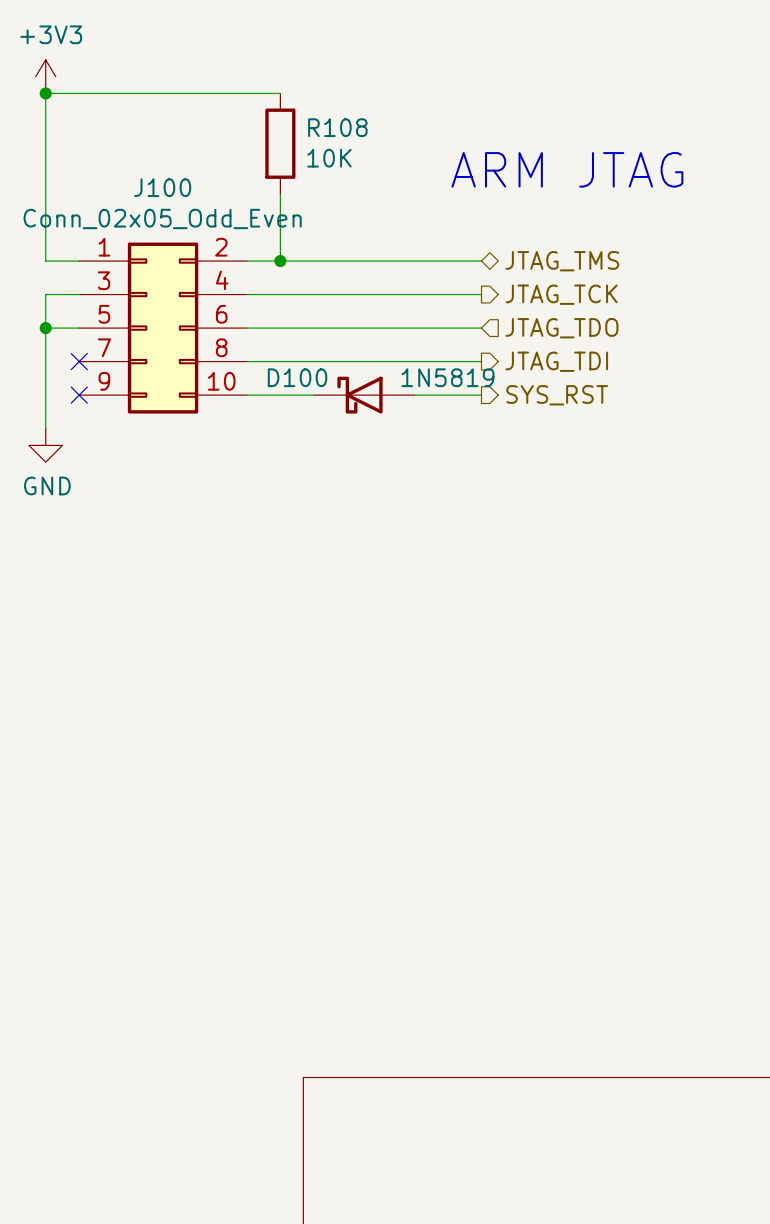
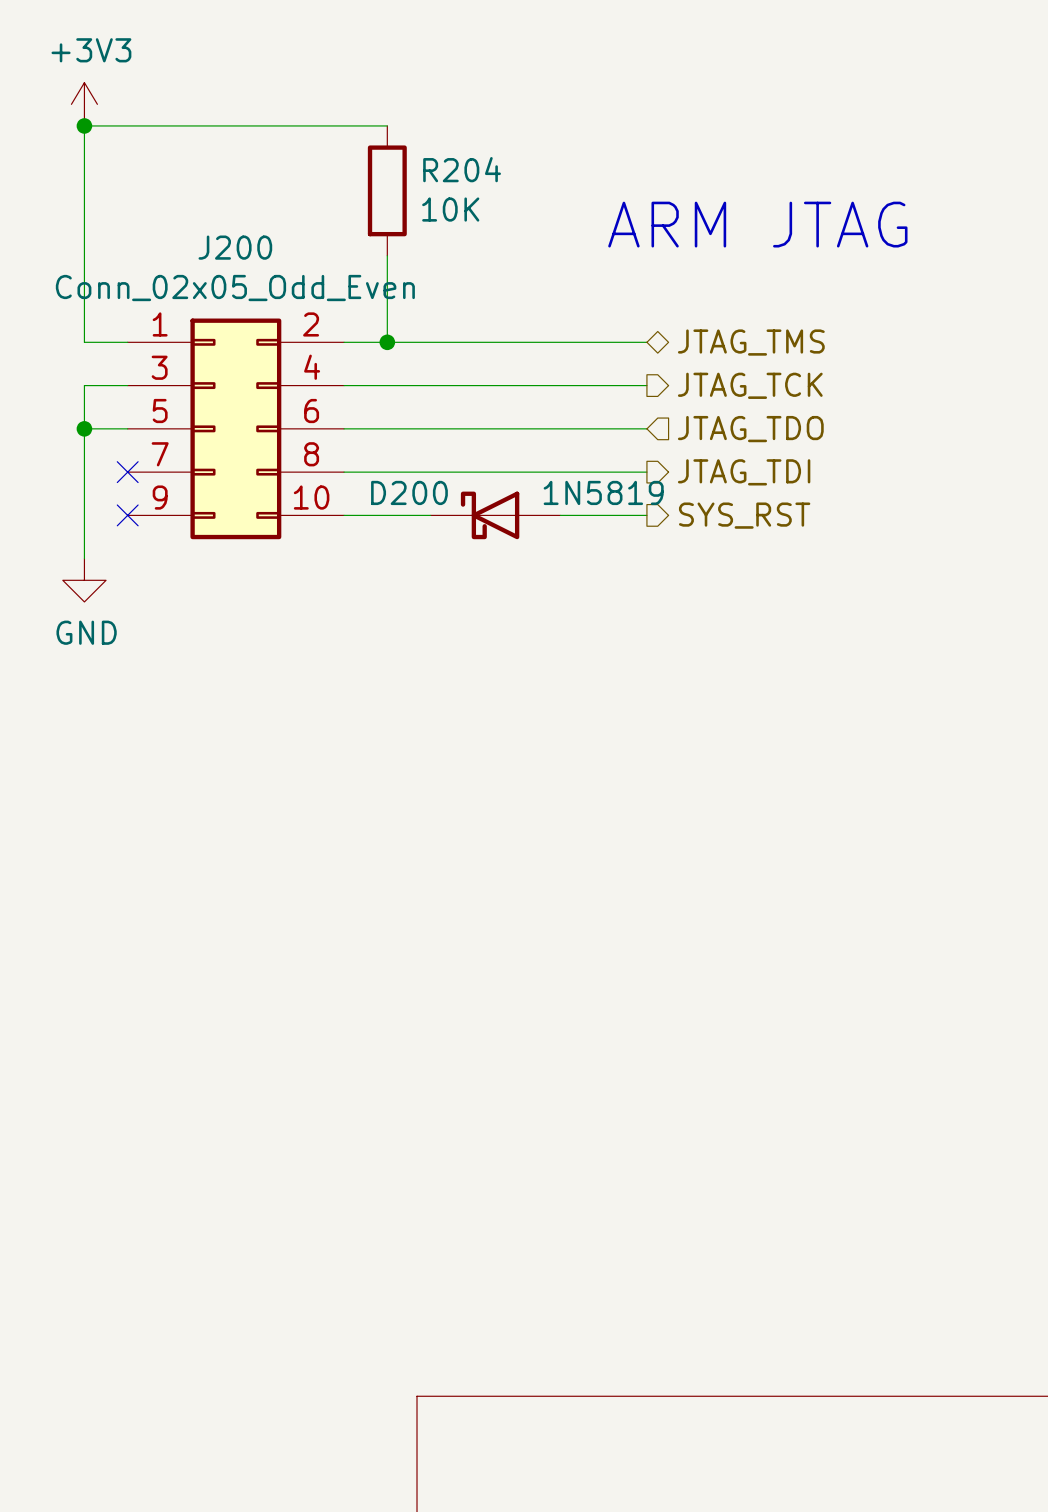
R108 name: R108 (337, 127) -> R204 (462, 169)
J100 name: J100 (162, 187) -> J200 (235, 247)
D100 name: D100 (297, 377) -> D200 (409, 492)

